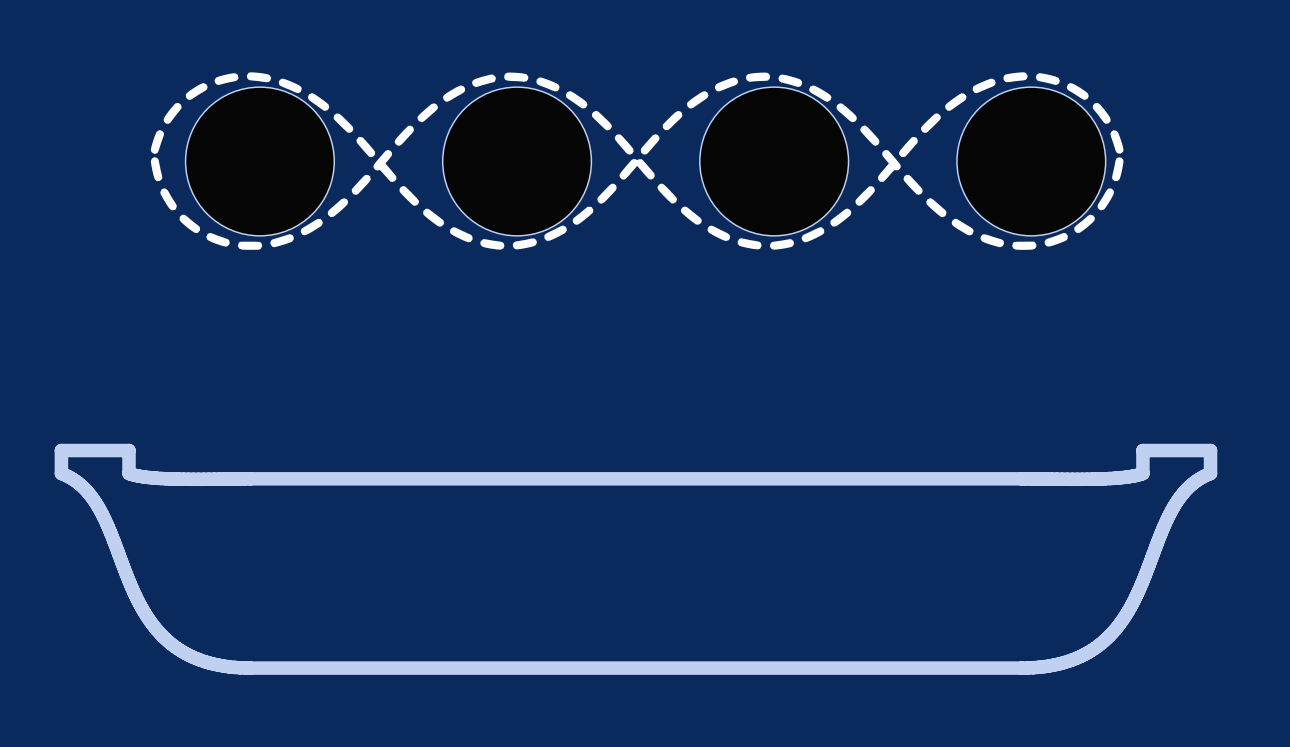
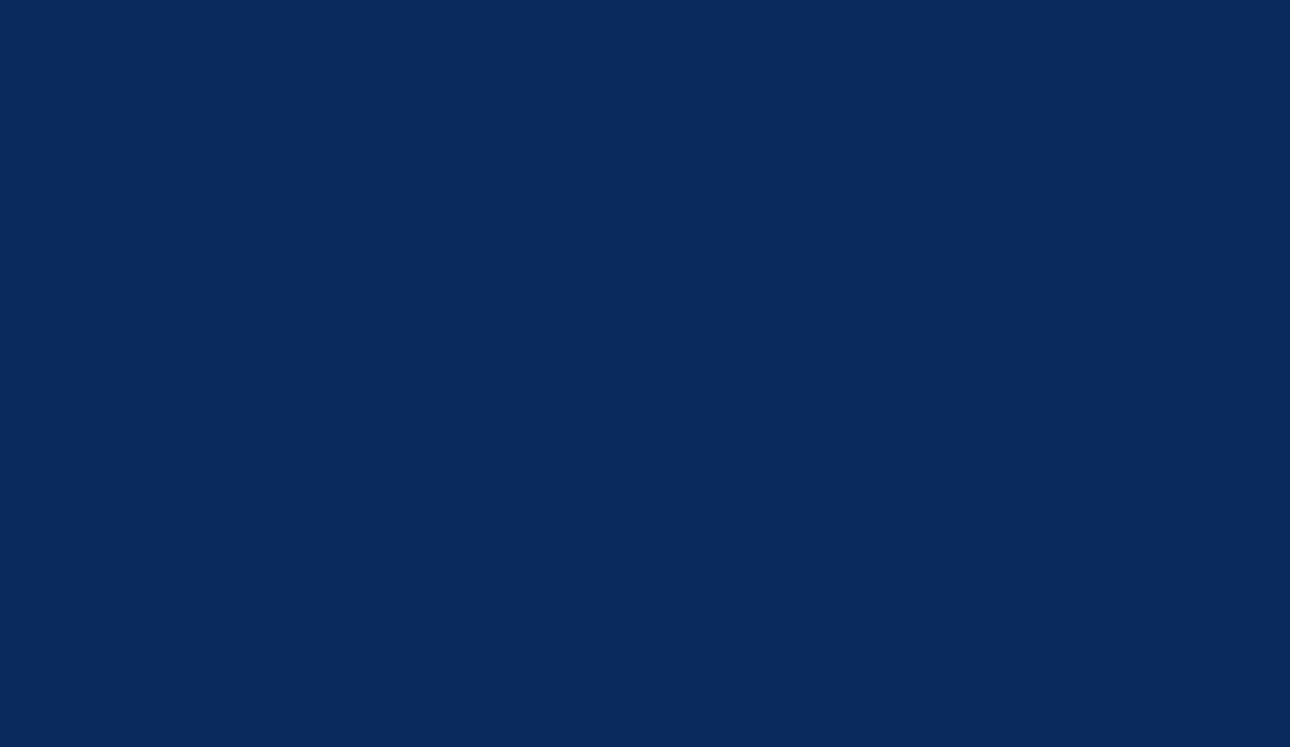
drawing: [150, 72, 1124, 250] -> none
part: (259, 161) -> none
part: (517, 161) -> none
part: (774, 161) -> none
part: (1031, 161) -> none
board edge: (61, 450) (61, 473) (80, 485) (97, 505) (108, 527) (136, 598) (157, 630) (174, 646) (196, 658) (218, 665) (245, 668) (1021, 668) (1054, 664) (1072, 659) (1091, 650) (1117, 626) (1137, 593) (1162, 529) (1175, 504) (1191, 484) (1210, 473) (1210, 450) (1142, 450) (1142, 473) (1101, 478) (178, 479) (149, 477) (129, 473) (129, 450) (61, 450) -> none

